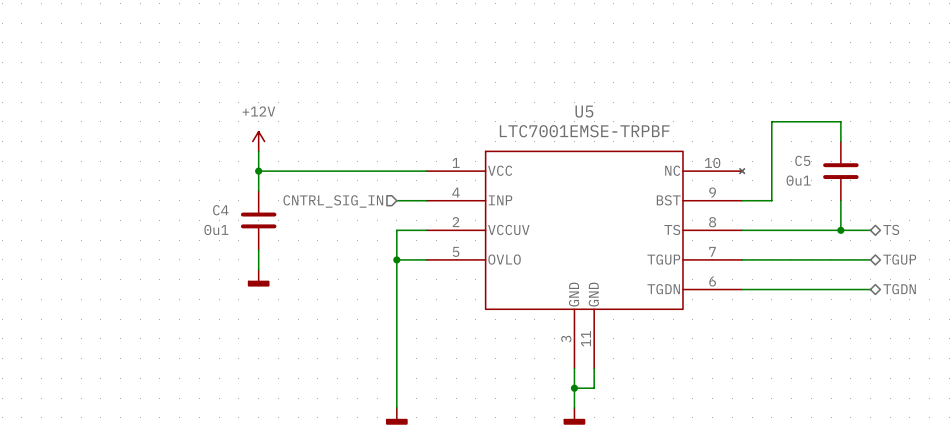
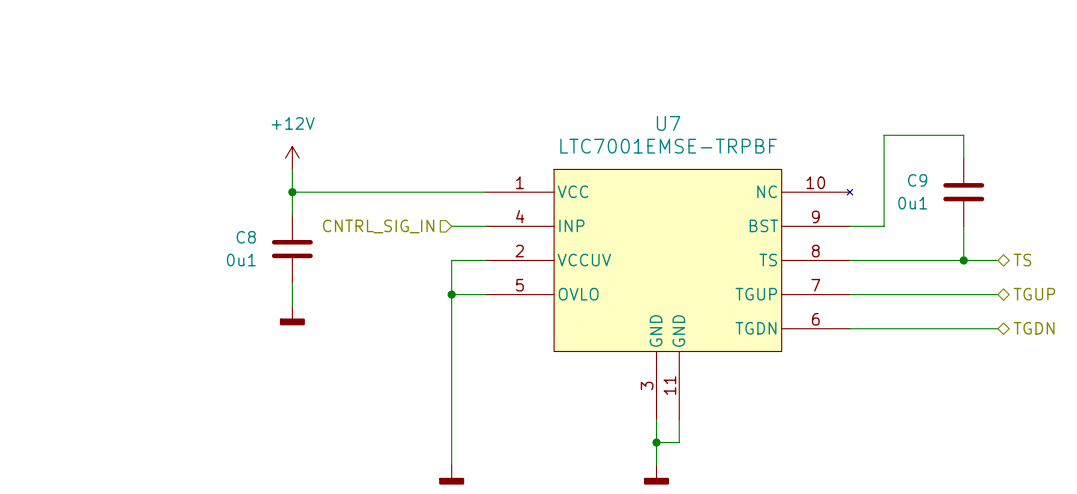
U5 name: U5 (584, 111) -> U7 (668, 123)
C5 name: C5 (802, 160) -> C9 (917, 180)
C4 name: C4 (220, 210) -> C8 (246, 237)

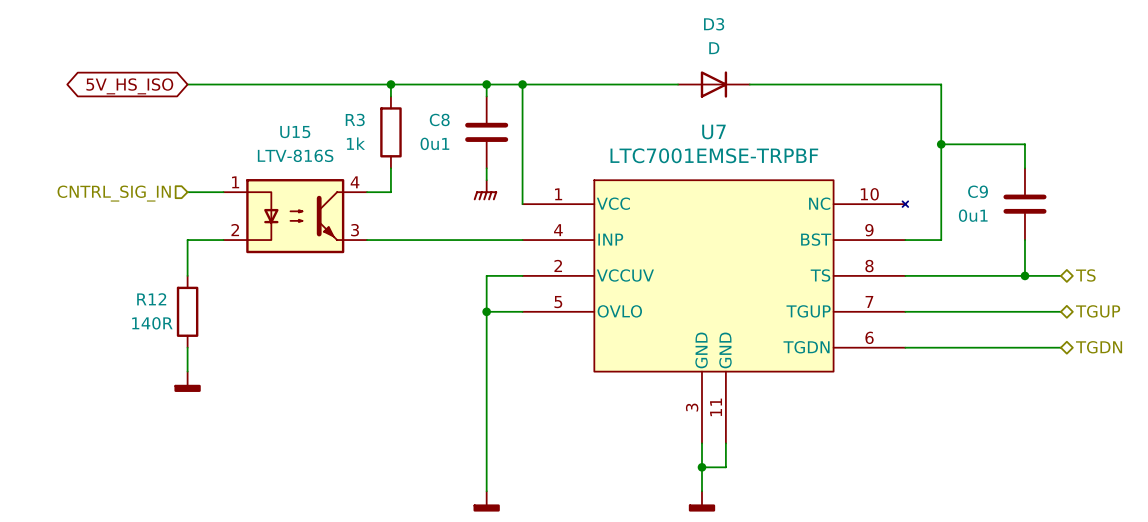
global label: none -> 5V_HS_ISO (129, 86)
wire: none -> (187, 84) (678, 84)
wire: none -> (390, 84) (390, 96)
junction: none -> (390, 84)
wire: none -> (486, 84) (486, 96)
junction: none -> (486, 84)
junction: none -> (522, 84)
D3: none -> D (713, 84)
wire: none -> (749, 84) (941, 84) (941, 144)
R3: none -> 1k (390, 132)
junction: none -> (941, 144)
power symbol: +12V (292, 158) -> none
wire: none -> (390, 168) (390, 192) (367, 192)
wire: none -> (486, 168) (486, 180)
power symbol: none -> (485, 190)
hierarchical label: none -> CNTRL_SIG_IN (114, 193)
wire: none -> (187, 192) (223, 192)
wire: (292, 192) (485, 192) -> (522, 84) (522, 204)
junction: (292, 192) -> none
U15: none -> LTV-816S (295, 216)
wire: none -> (223, 240) (187, 240) (187, 275)
wire: none -> (367, 240) (486, 240)
hierarchical label: CNTRL_SIG_IN (378, 226) -> none
C8 position: (292, 249) -> (486, 132)
wire: (292, 283) (292, 305) -> (187, 347) (187, 371)
R12: none -> 140R (187, 311)
power symbol position: (292, 315) -> (187, 381)

